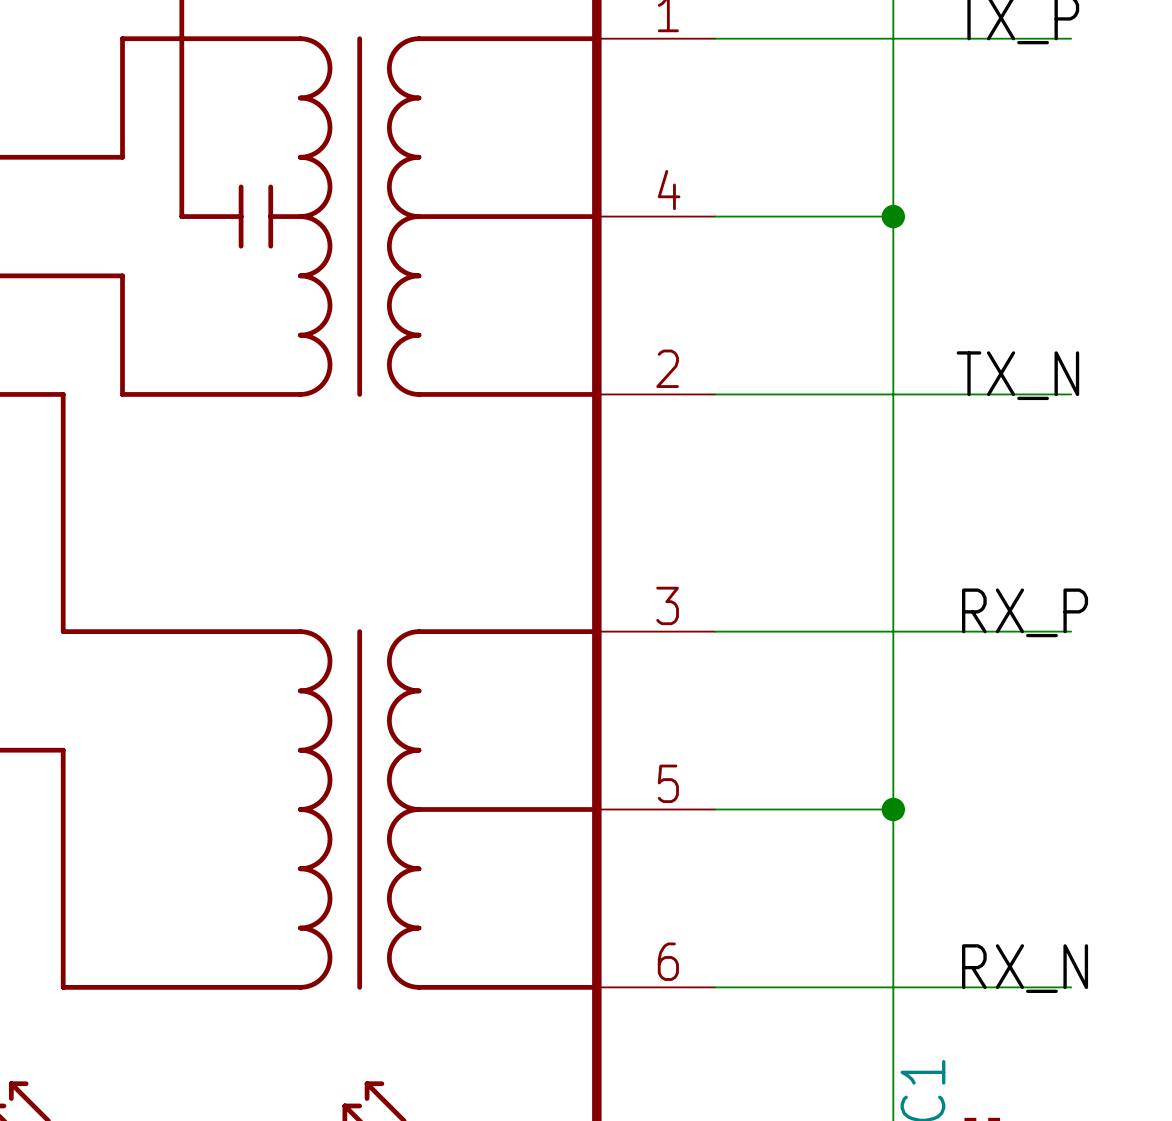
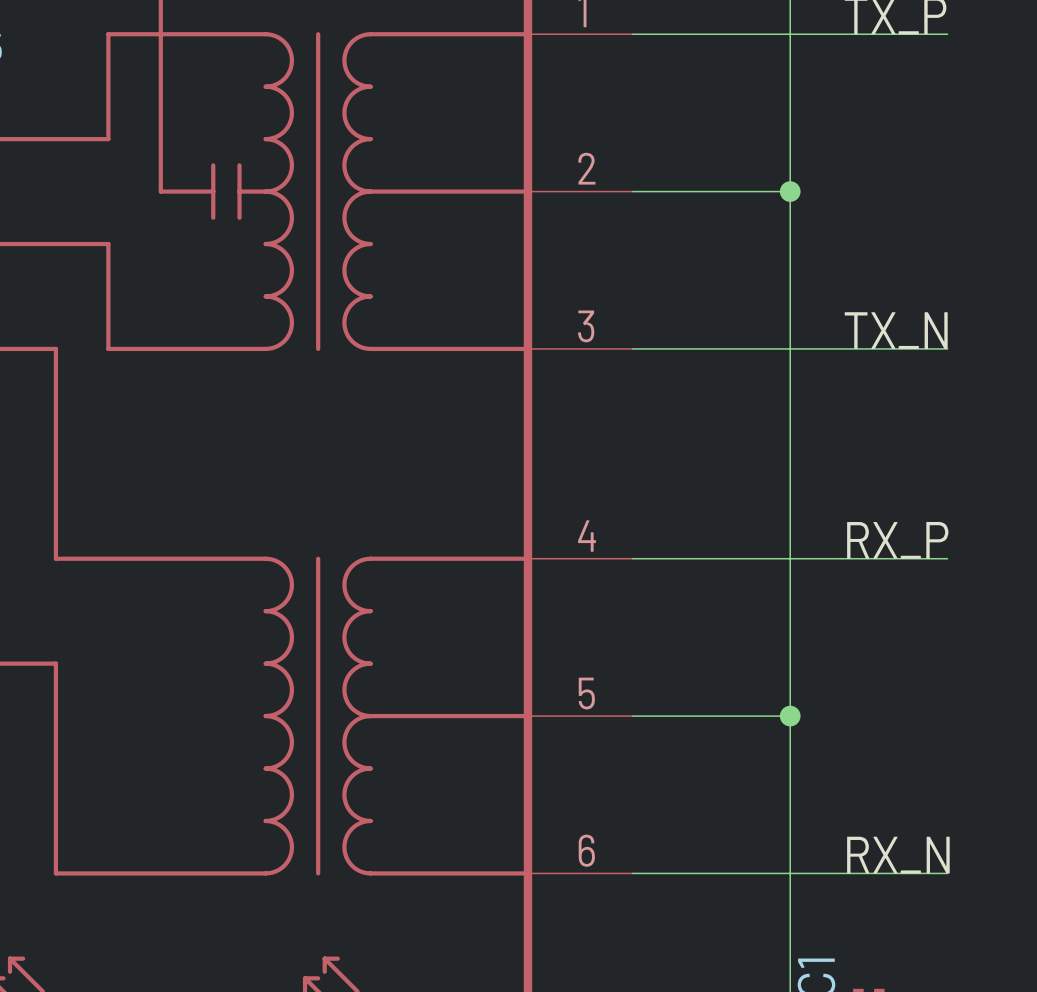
part pin number: 4 (669, 190) -> 2 (586, 168)
part pin number: 2 (667, 368) -> 3 (586, 326)
part pin number: 3 (667, 605) -> 4 (586, 536)

